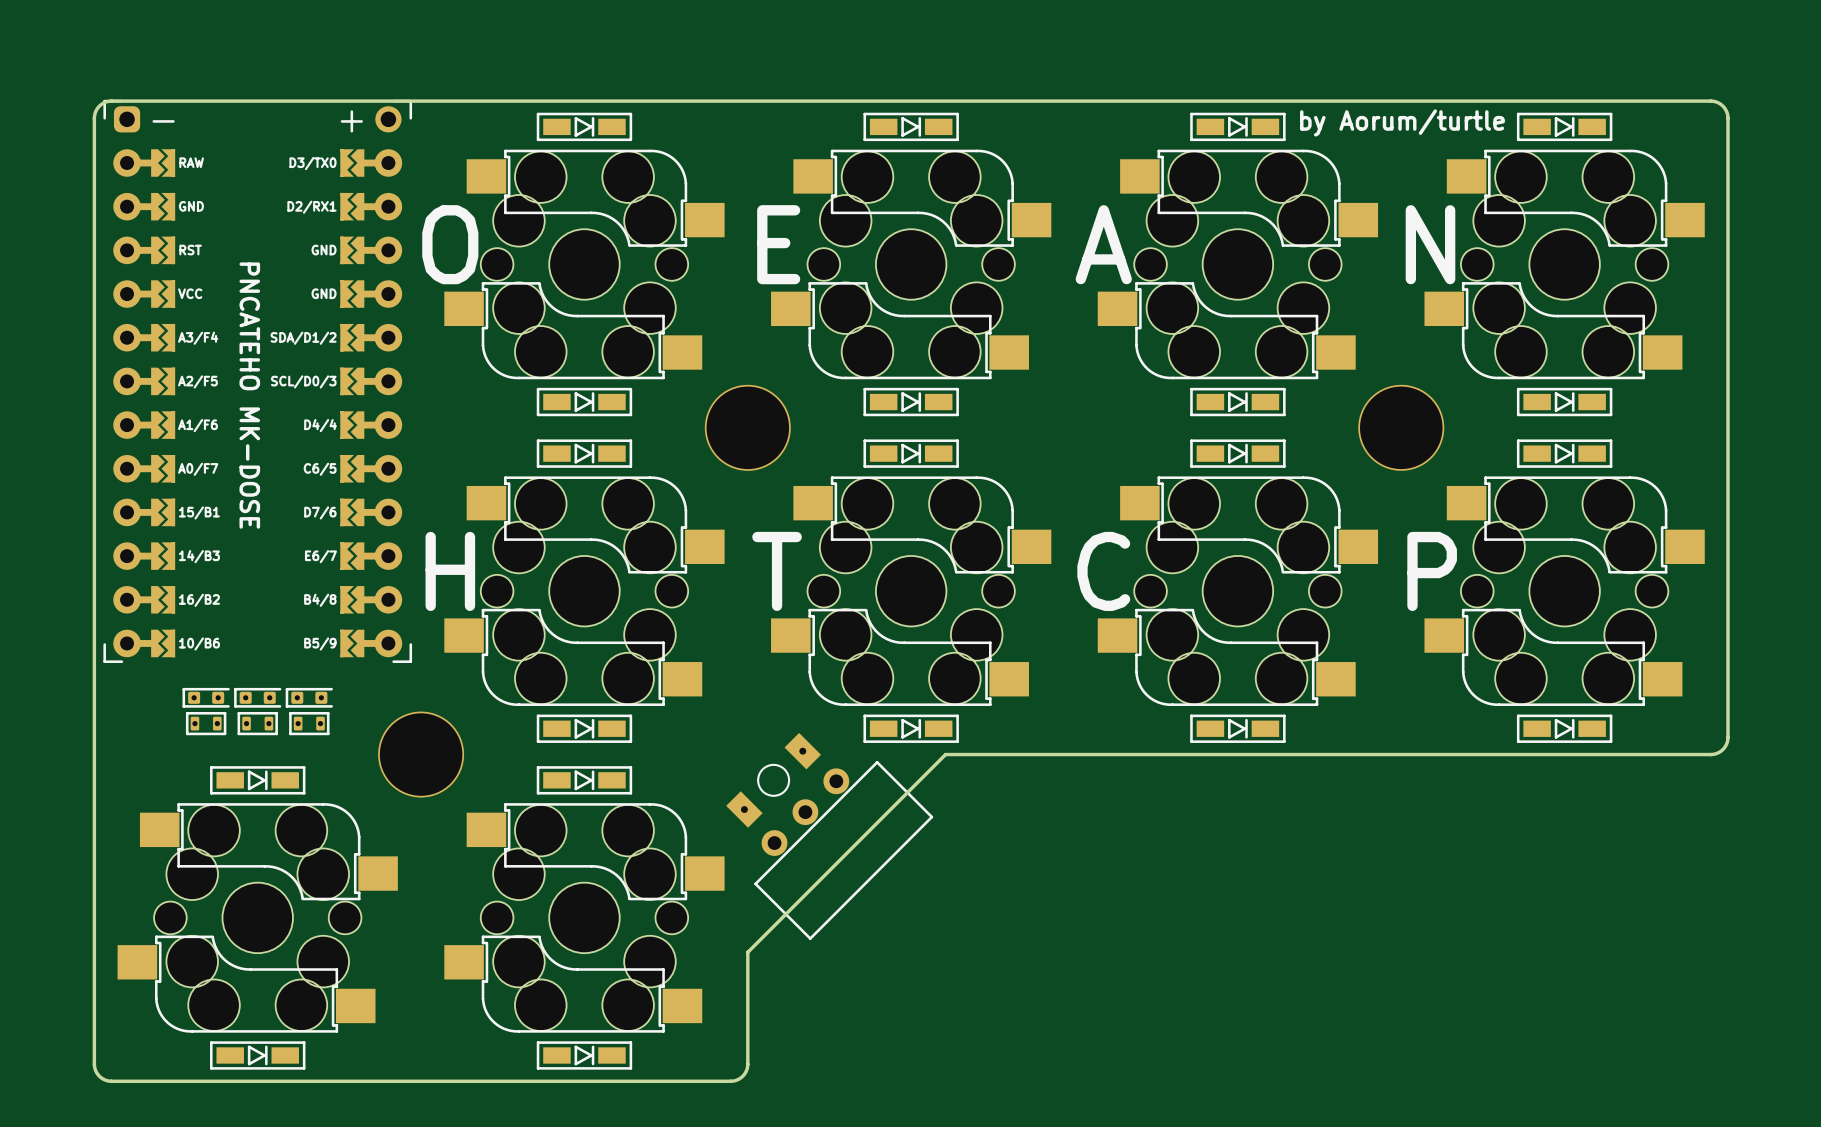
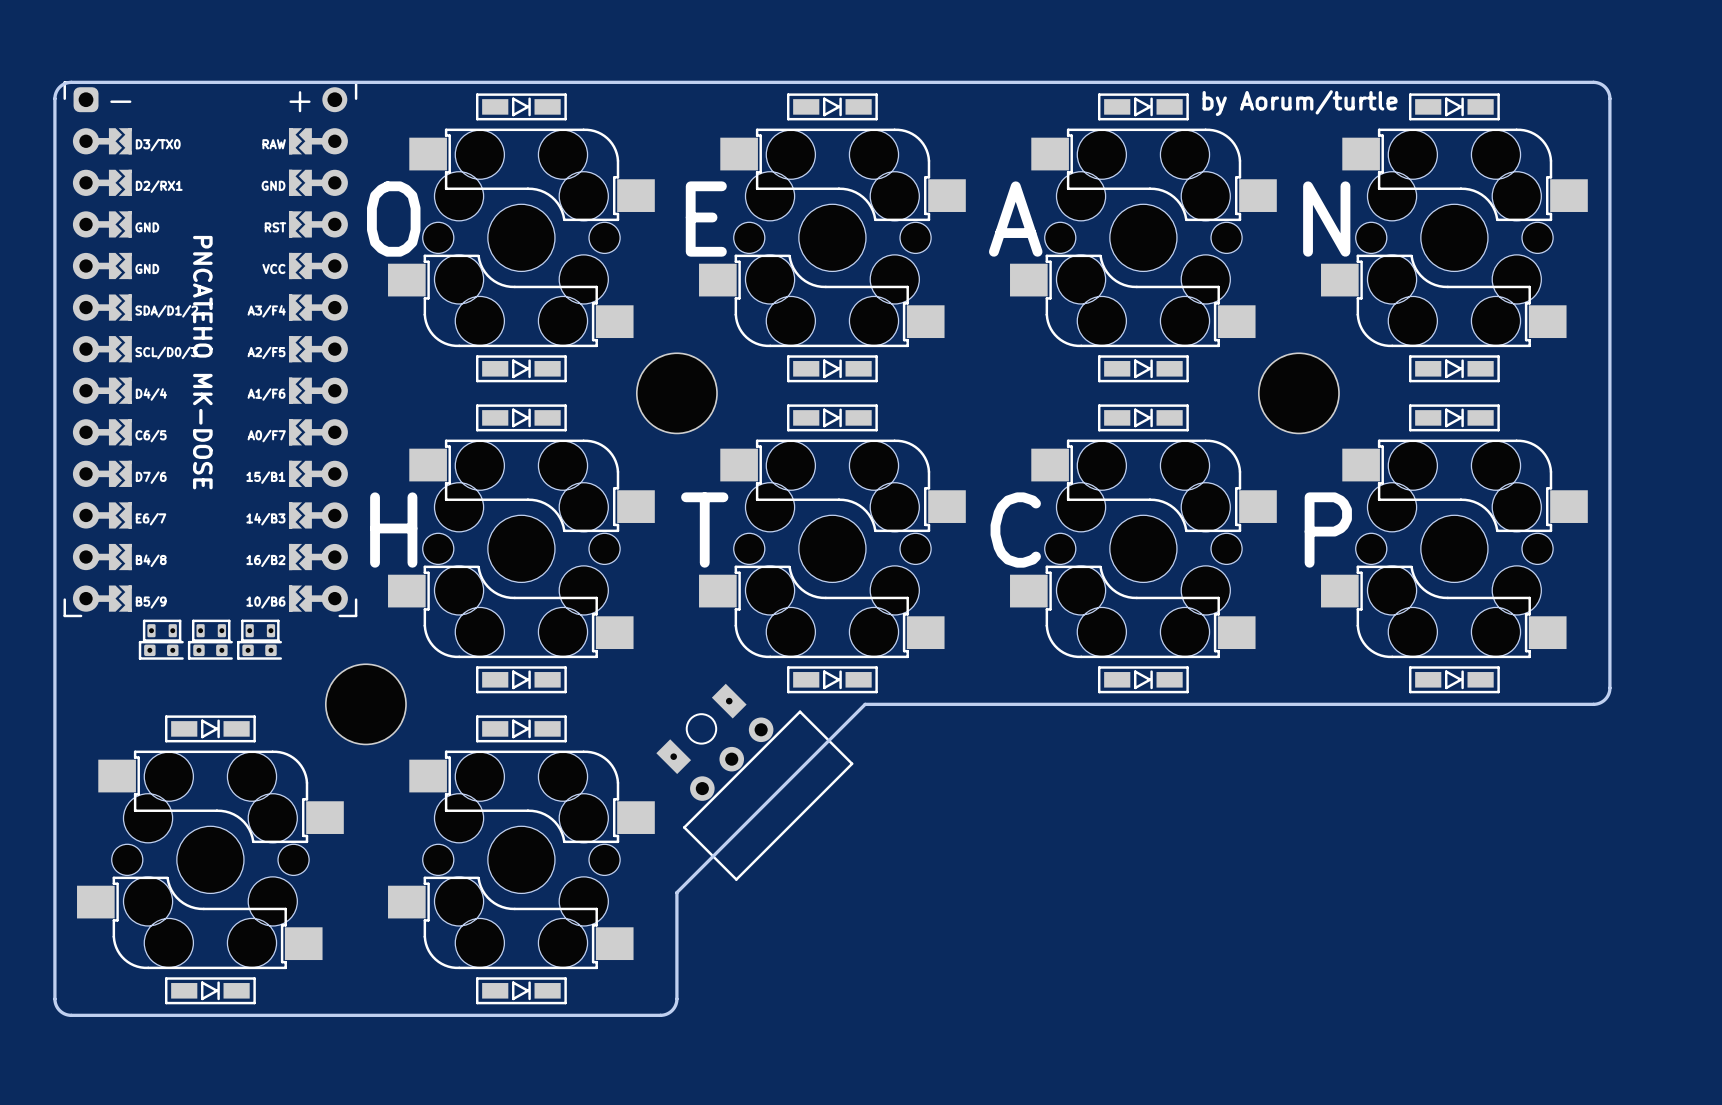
part footprint: [103, 99, 413, 663] -> [63, 81, 358, 618]
part: none -> (162, 630)
part: none -> (211, 630)
part: none -> (260, 630)
part: (206, 723) -> none
part: (257, 723) -> none
part: (309, 723) -> none

